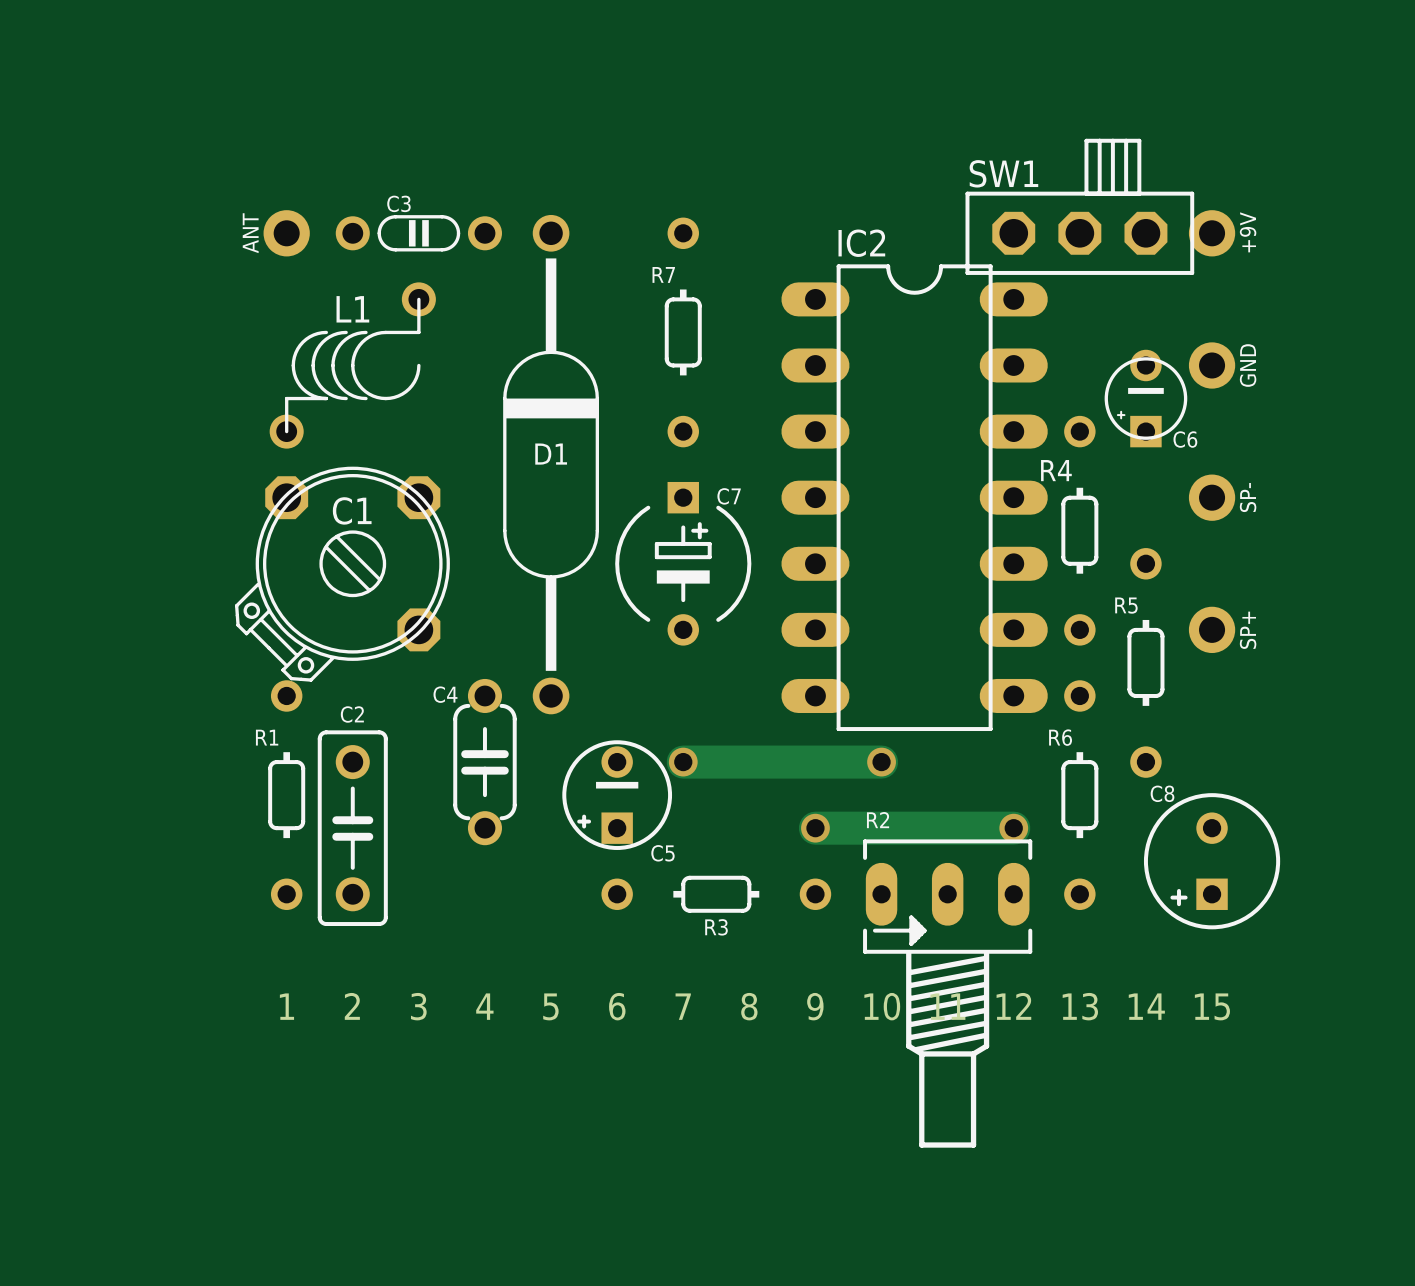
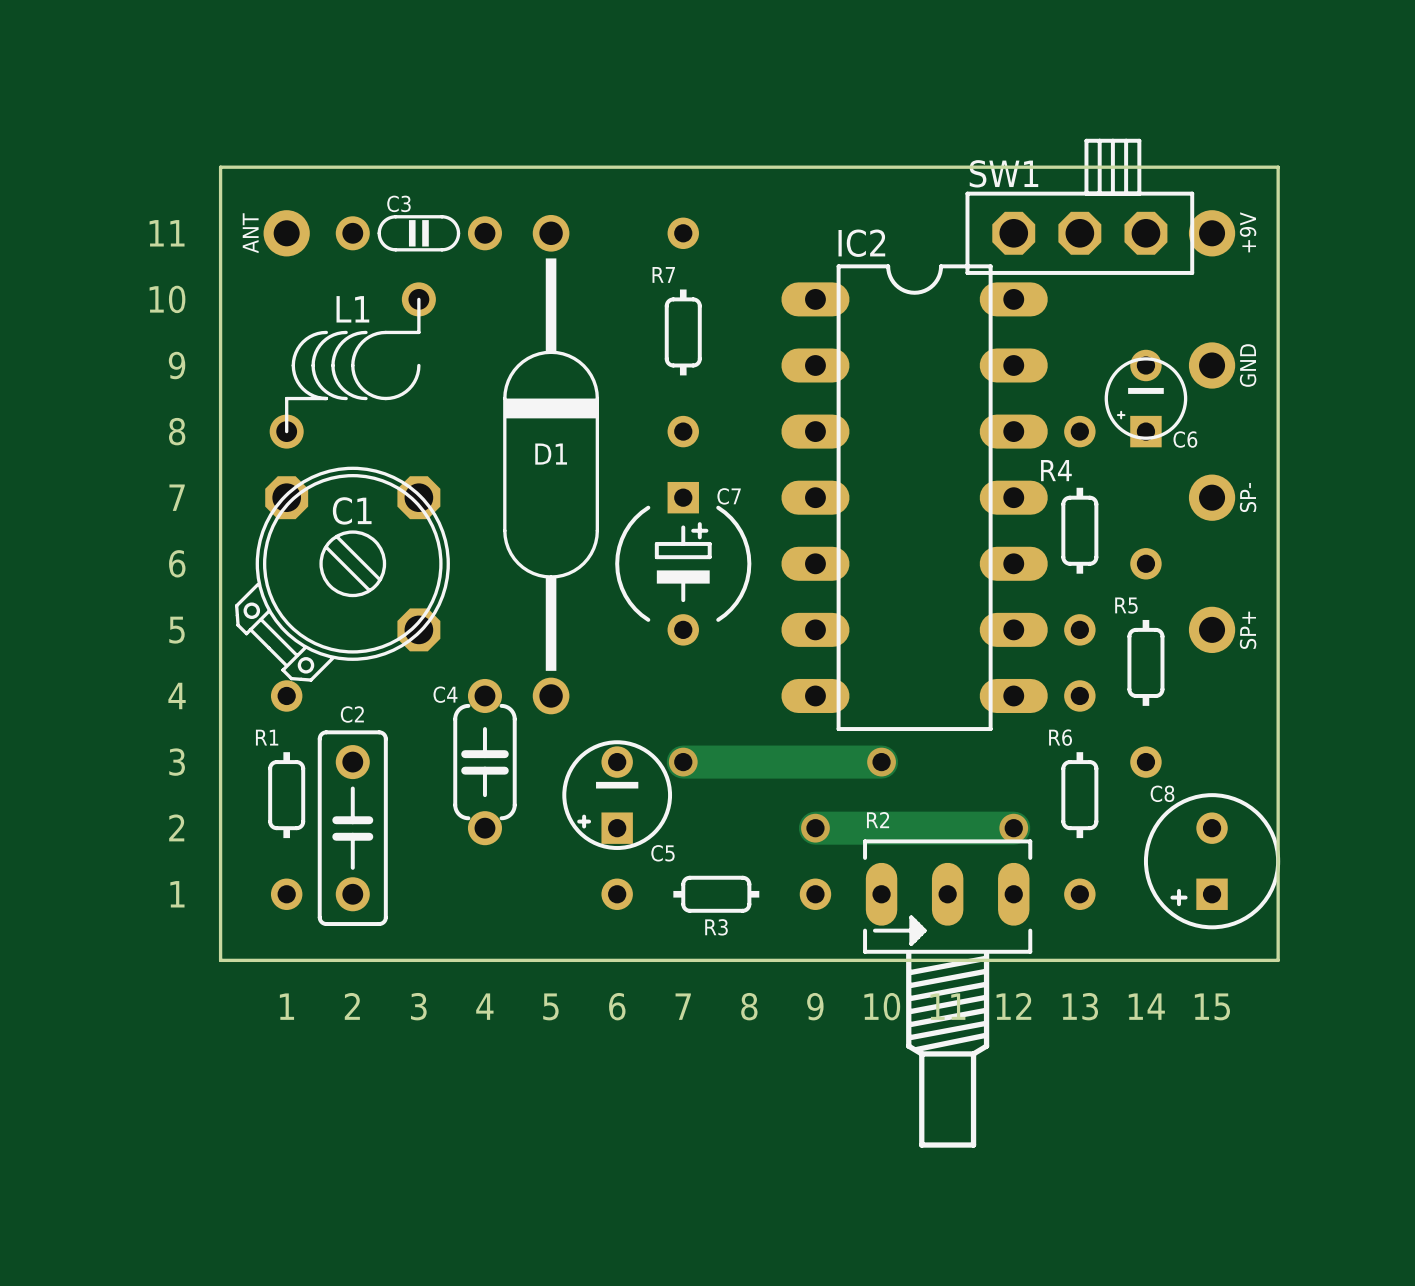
board edge: none -> (220, 167) (1278, 167) (1278, 960) (220, 960) (220, 167)
text: none -> 11 (167, 233)
text: none -> 10 (167, 299)
text: none -> 9 (177, 365)
text: none -> 8 (177, 431)
text: none -> 7 (177, 497)
text: none -> 6 (177, 563)
text: none -> 5 (176, 630)
text: none -> 4 (177, 695)
text: none -> 3 (177, 762)
text: none -> 2 (176, 827)
text: none -> 1 (177, 894)

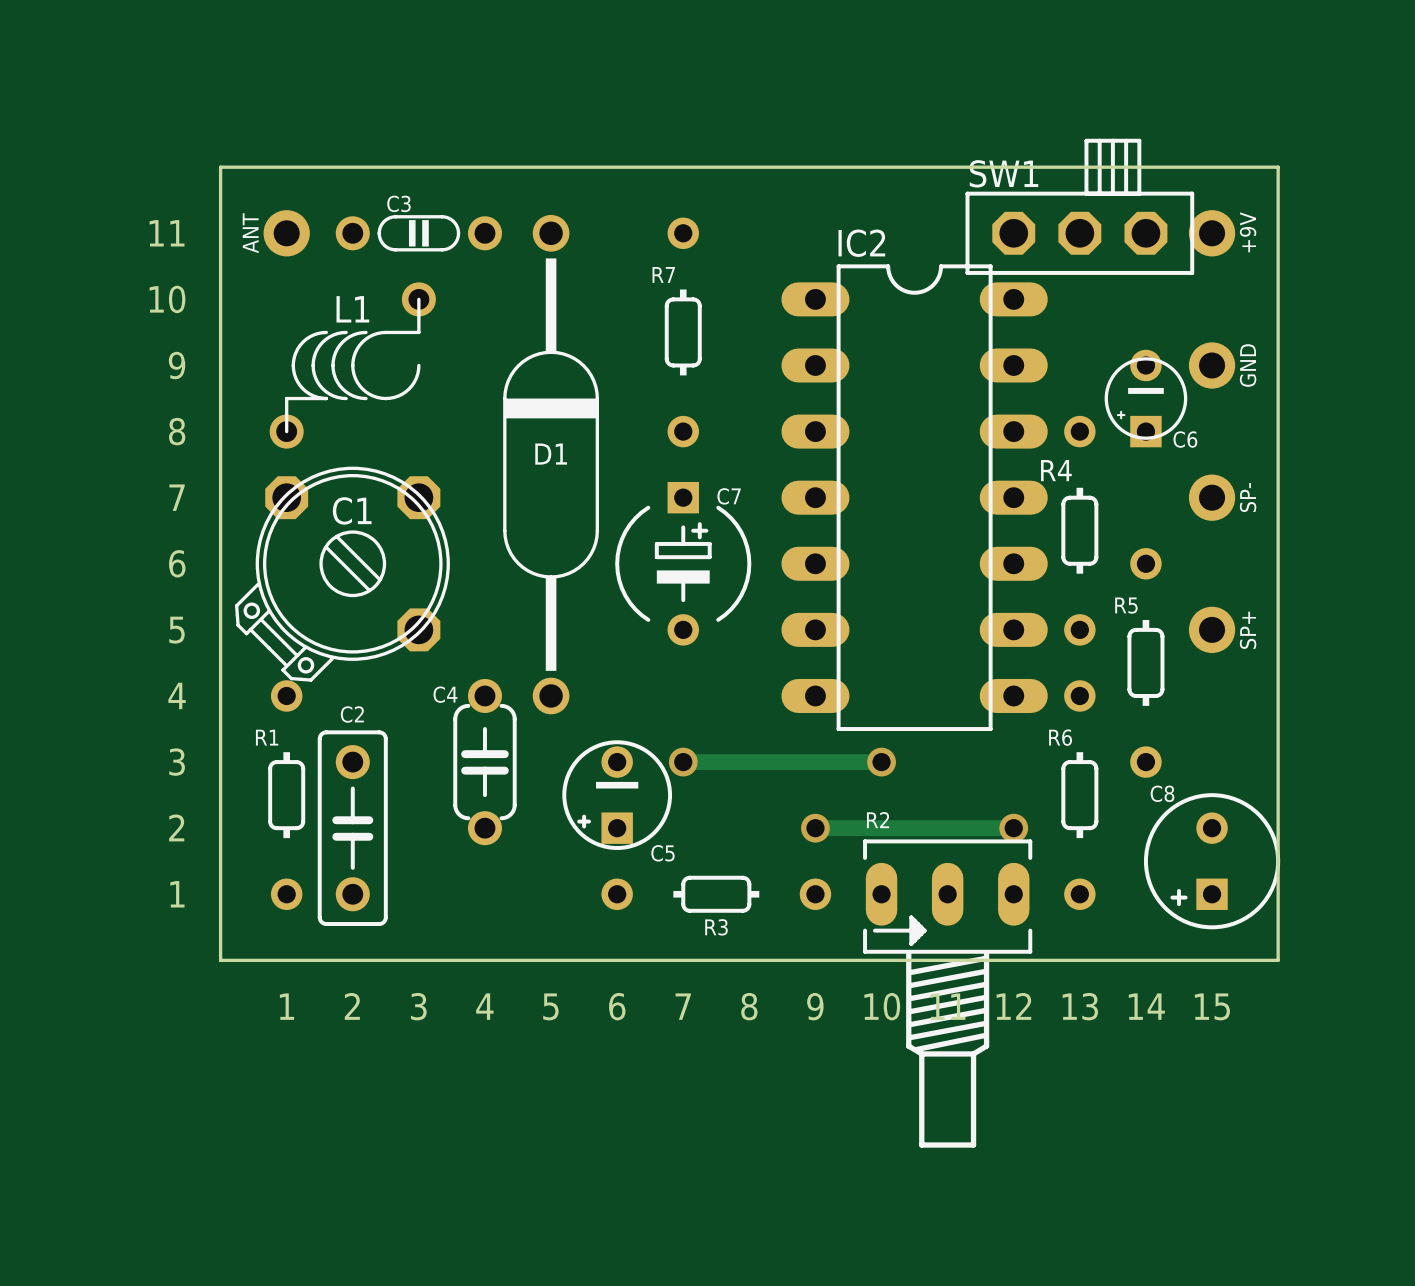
track width: thick (683, 762) (881, 762) -> thin (683, 762) (881, 762)
track width: thick (815, 828) (1013, 828) -> thin (815, 828) (1013, 828)

